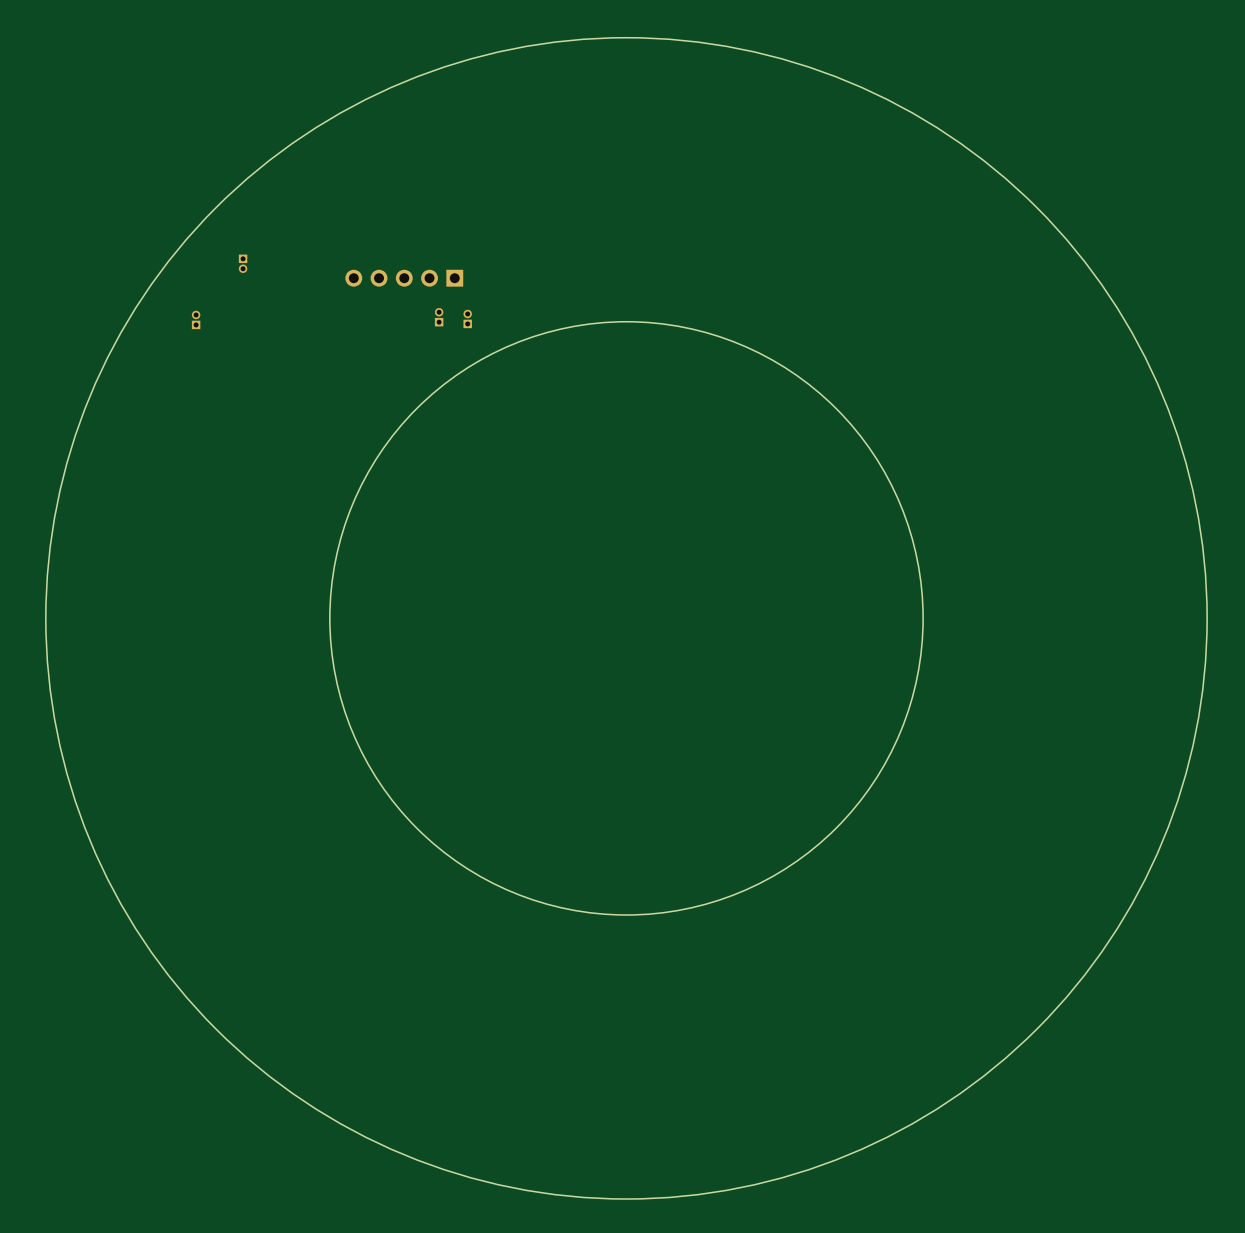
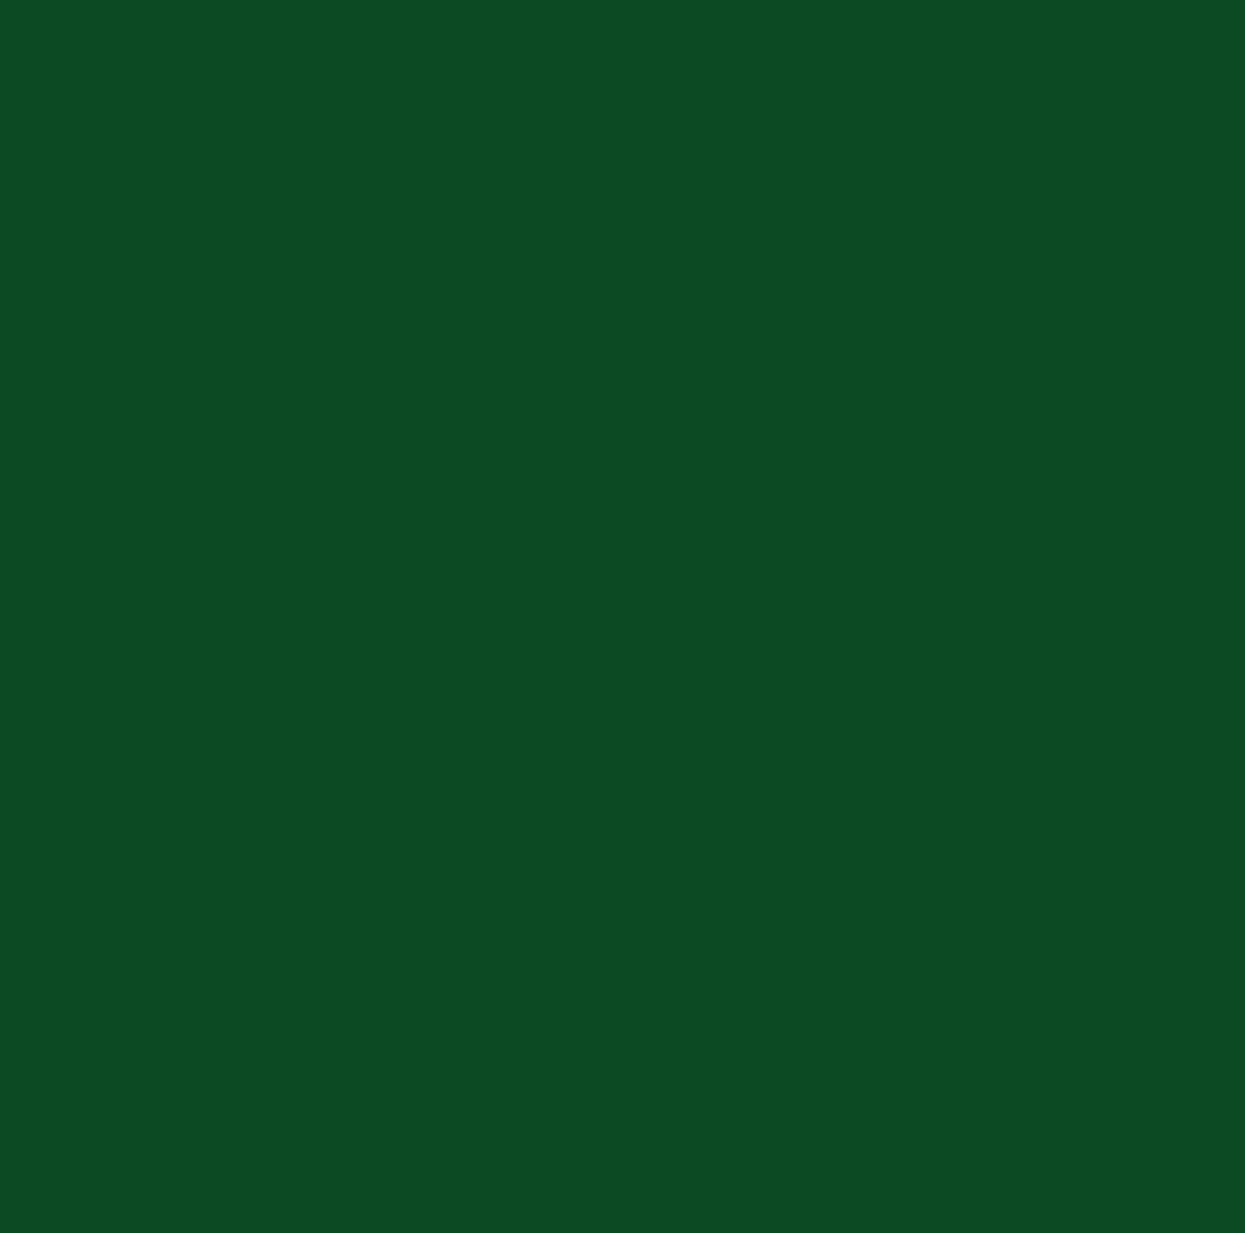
round board edge: [45, 37, 1208, 1200] -> none
part: (243, 263) -> none
part: (404, 278) -> none
part: (439, 317) -> none
part: (467, 318) -> none
part: (196, 319) -> none
round board edge: [329, 321, 924, 916] -> none

